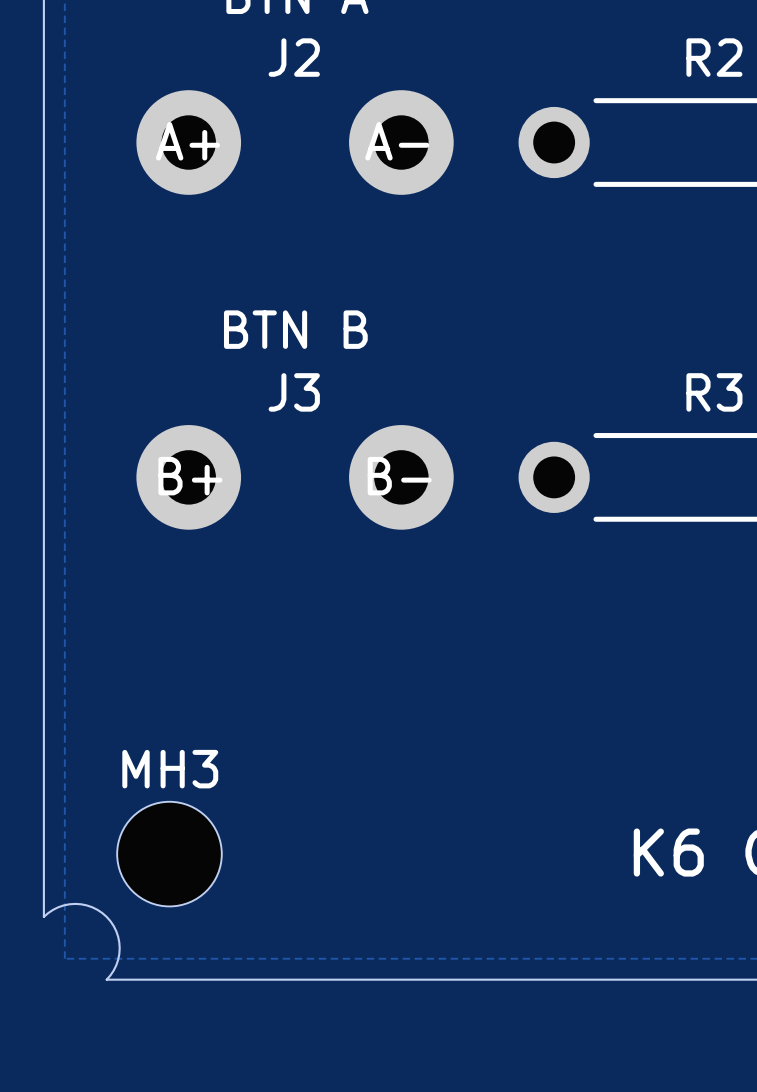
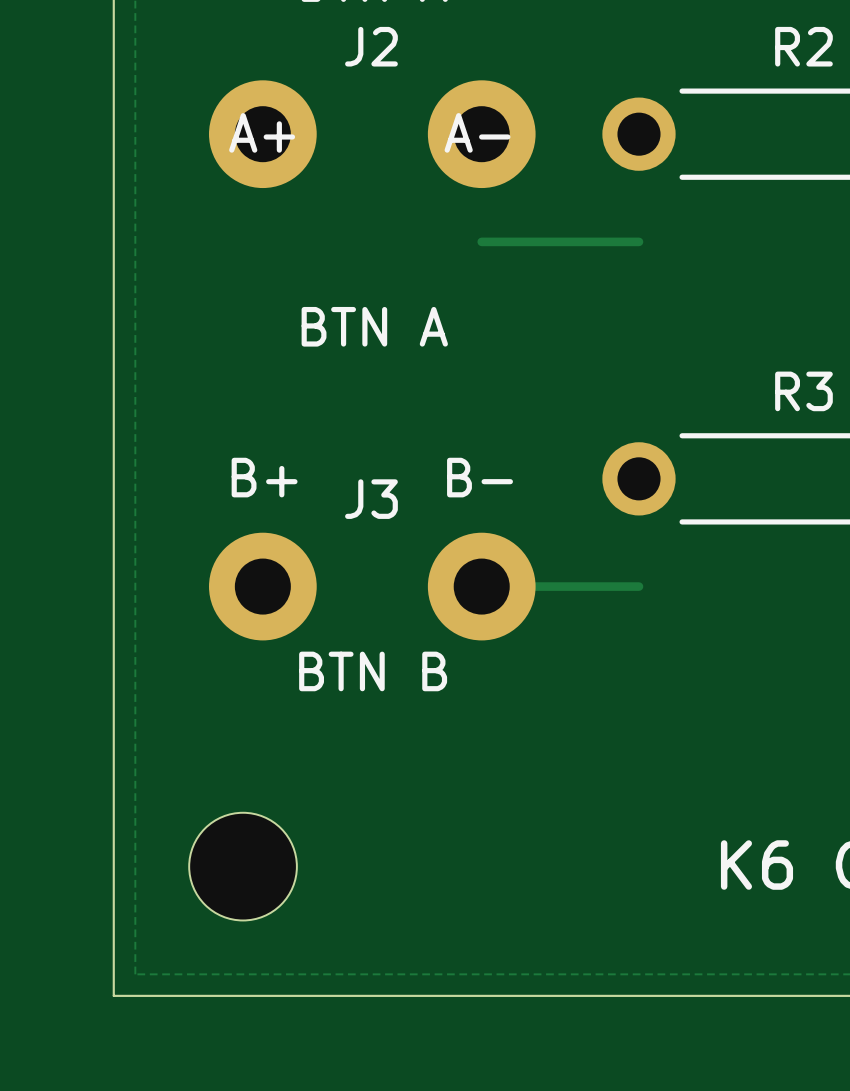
track: none -> (481, 241) (638, 241)
text: BTN B (295, 329) -> BTN A (374, 326)
J3 position: (295, 477) -> (372, 586)
track: none -> (481, 586) (638, 586)
text: none -> BTN B (373, 671)
MH3 name: MH3 (170, 769) -> none
board edge: (43, 916) (58, 907) (75, 903) (92, 907) (106, 916) (116, 931) (119, 948) (116, 965) (106, 979) -> (113, 931) (113, 995) (178, 995)

